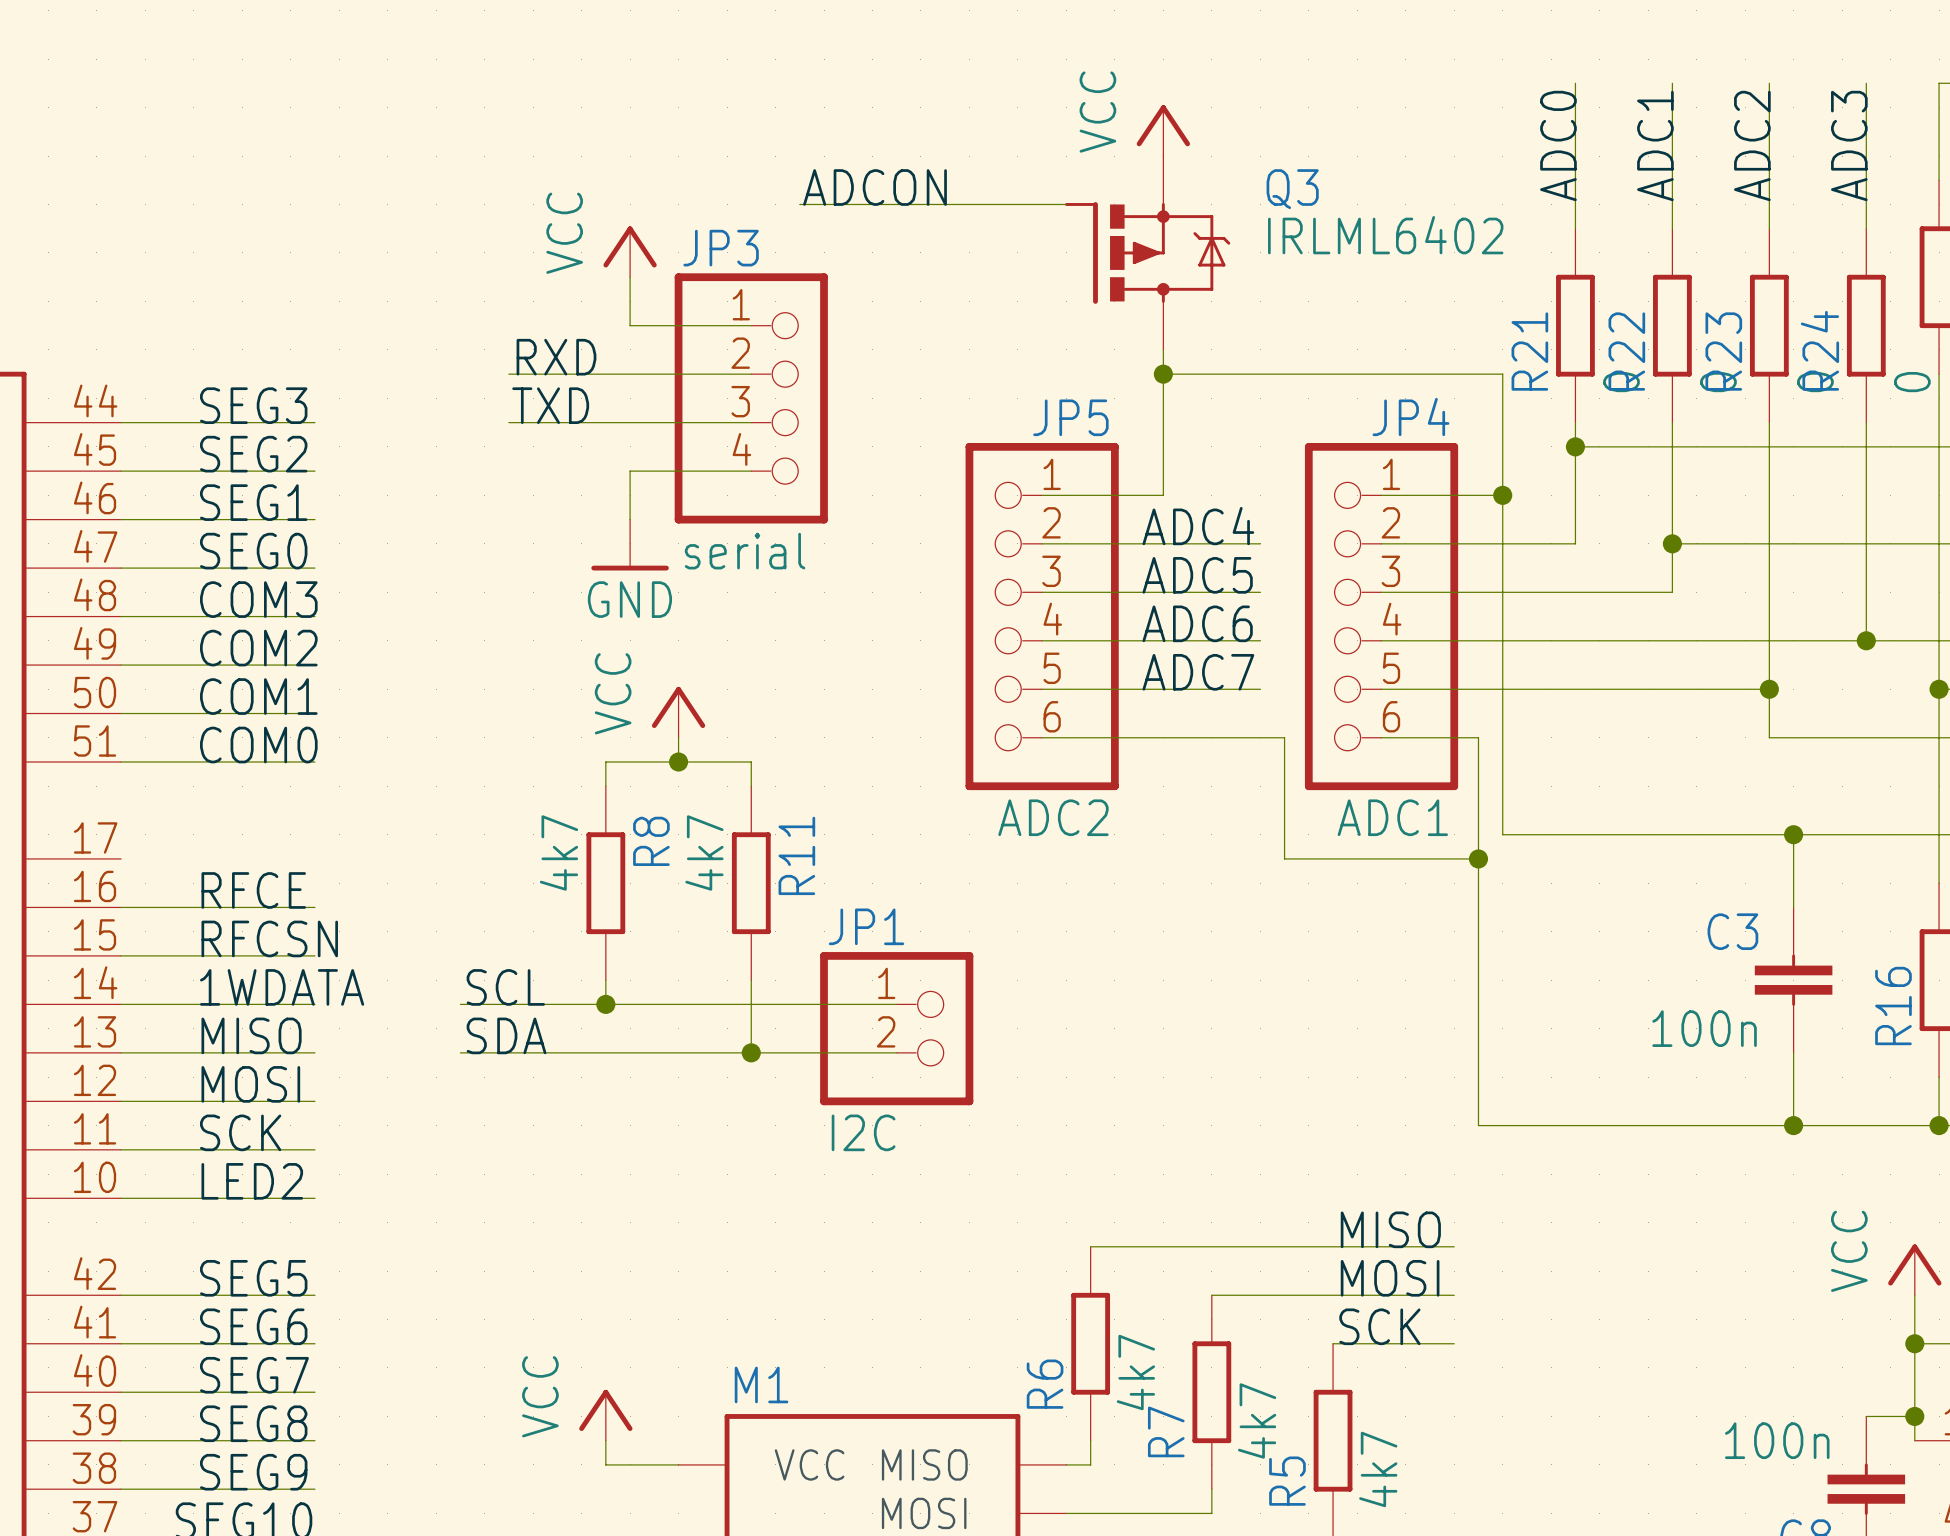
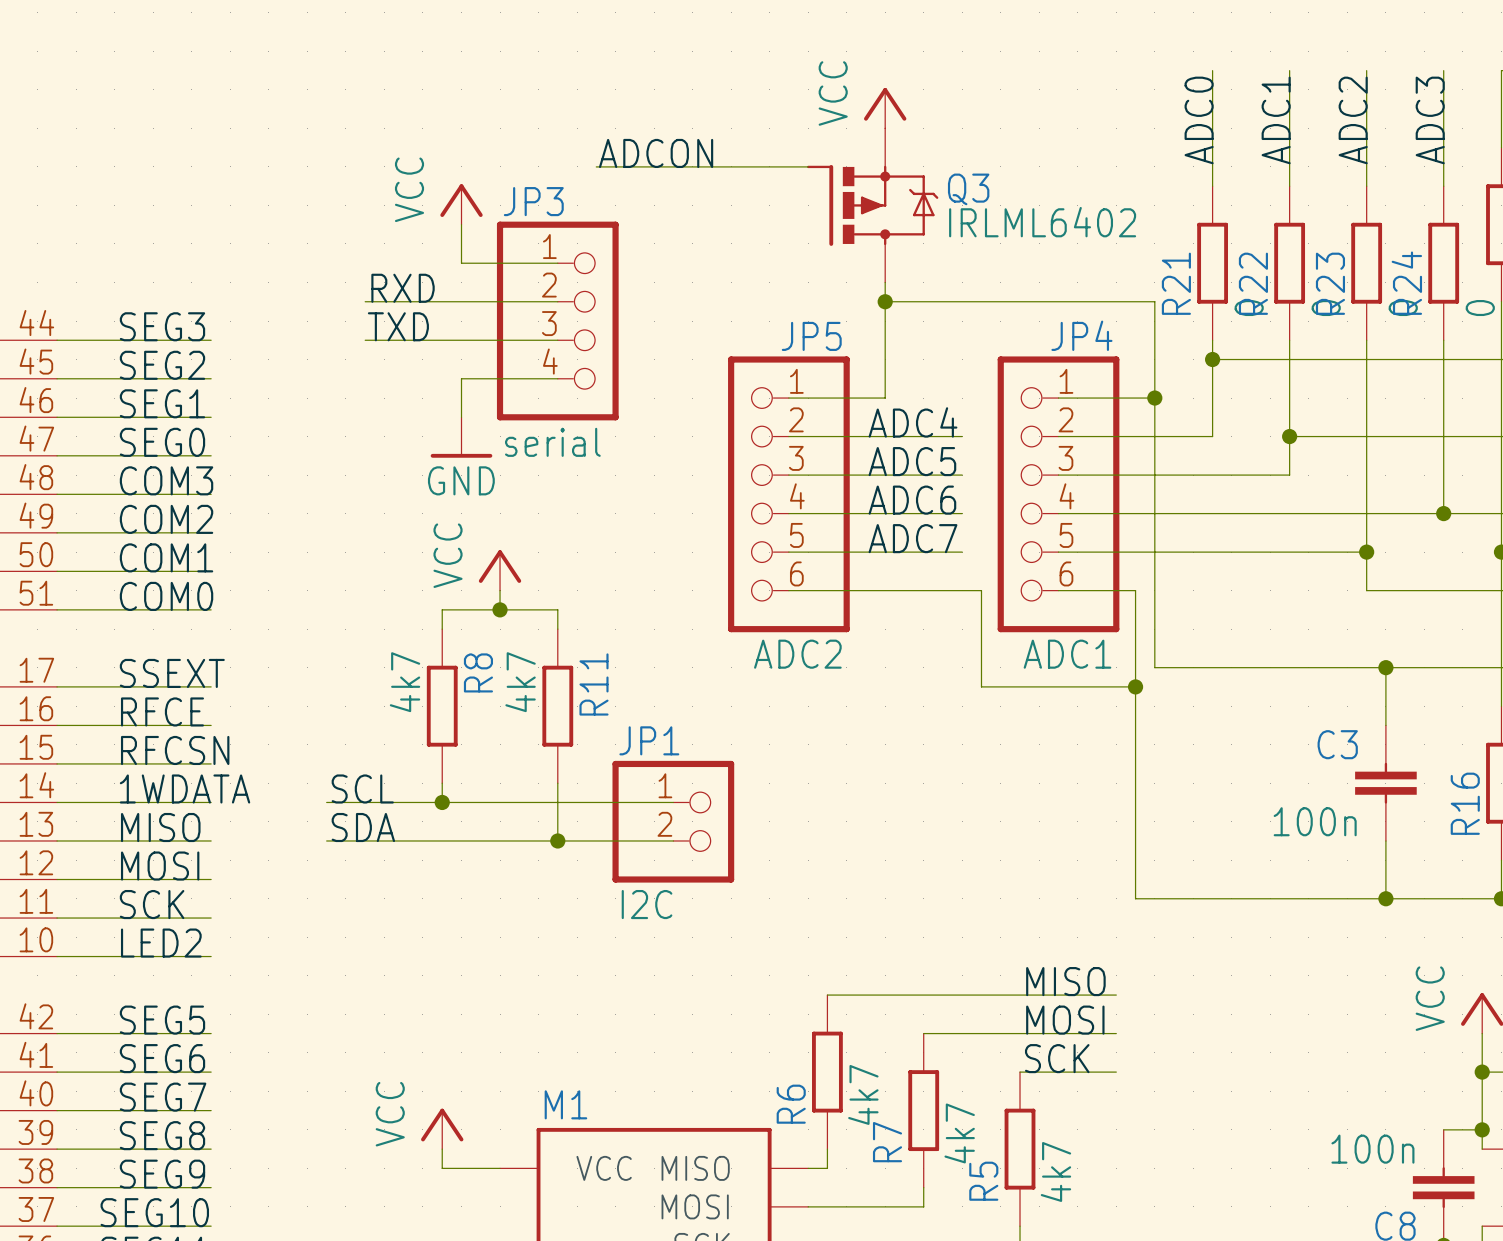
Q3 name position: Q3 (1292, 189) -> Q3 (968, 189)
Q3 value position: IRLML6402 (1385, 235) -> IRLML6402 (1042, 222)
label: none -> SSEXT (172, 673)
wire: none -> (57, 686) (211, 686)

